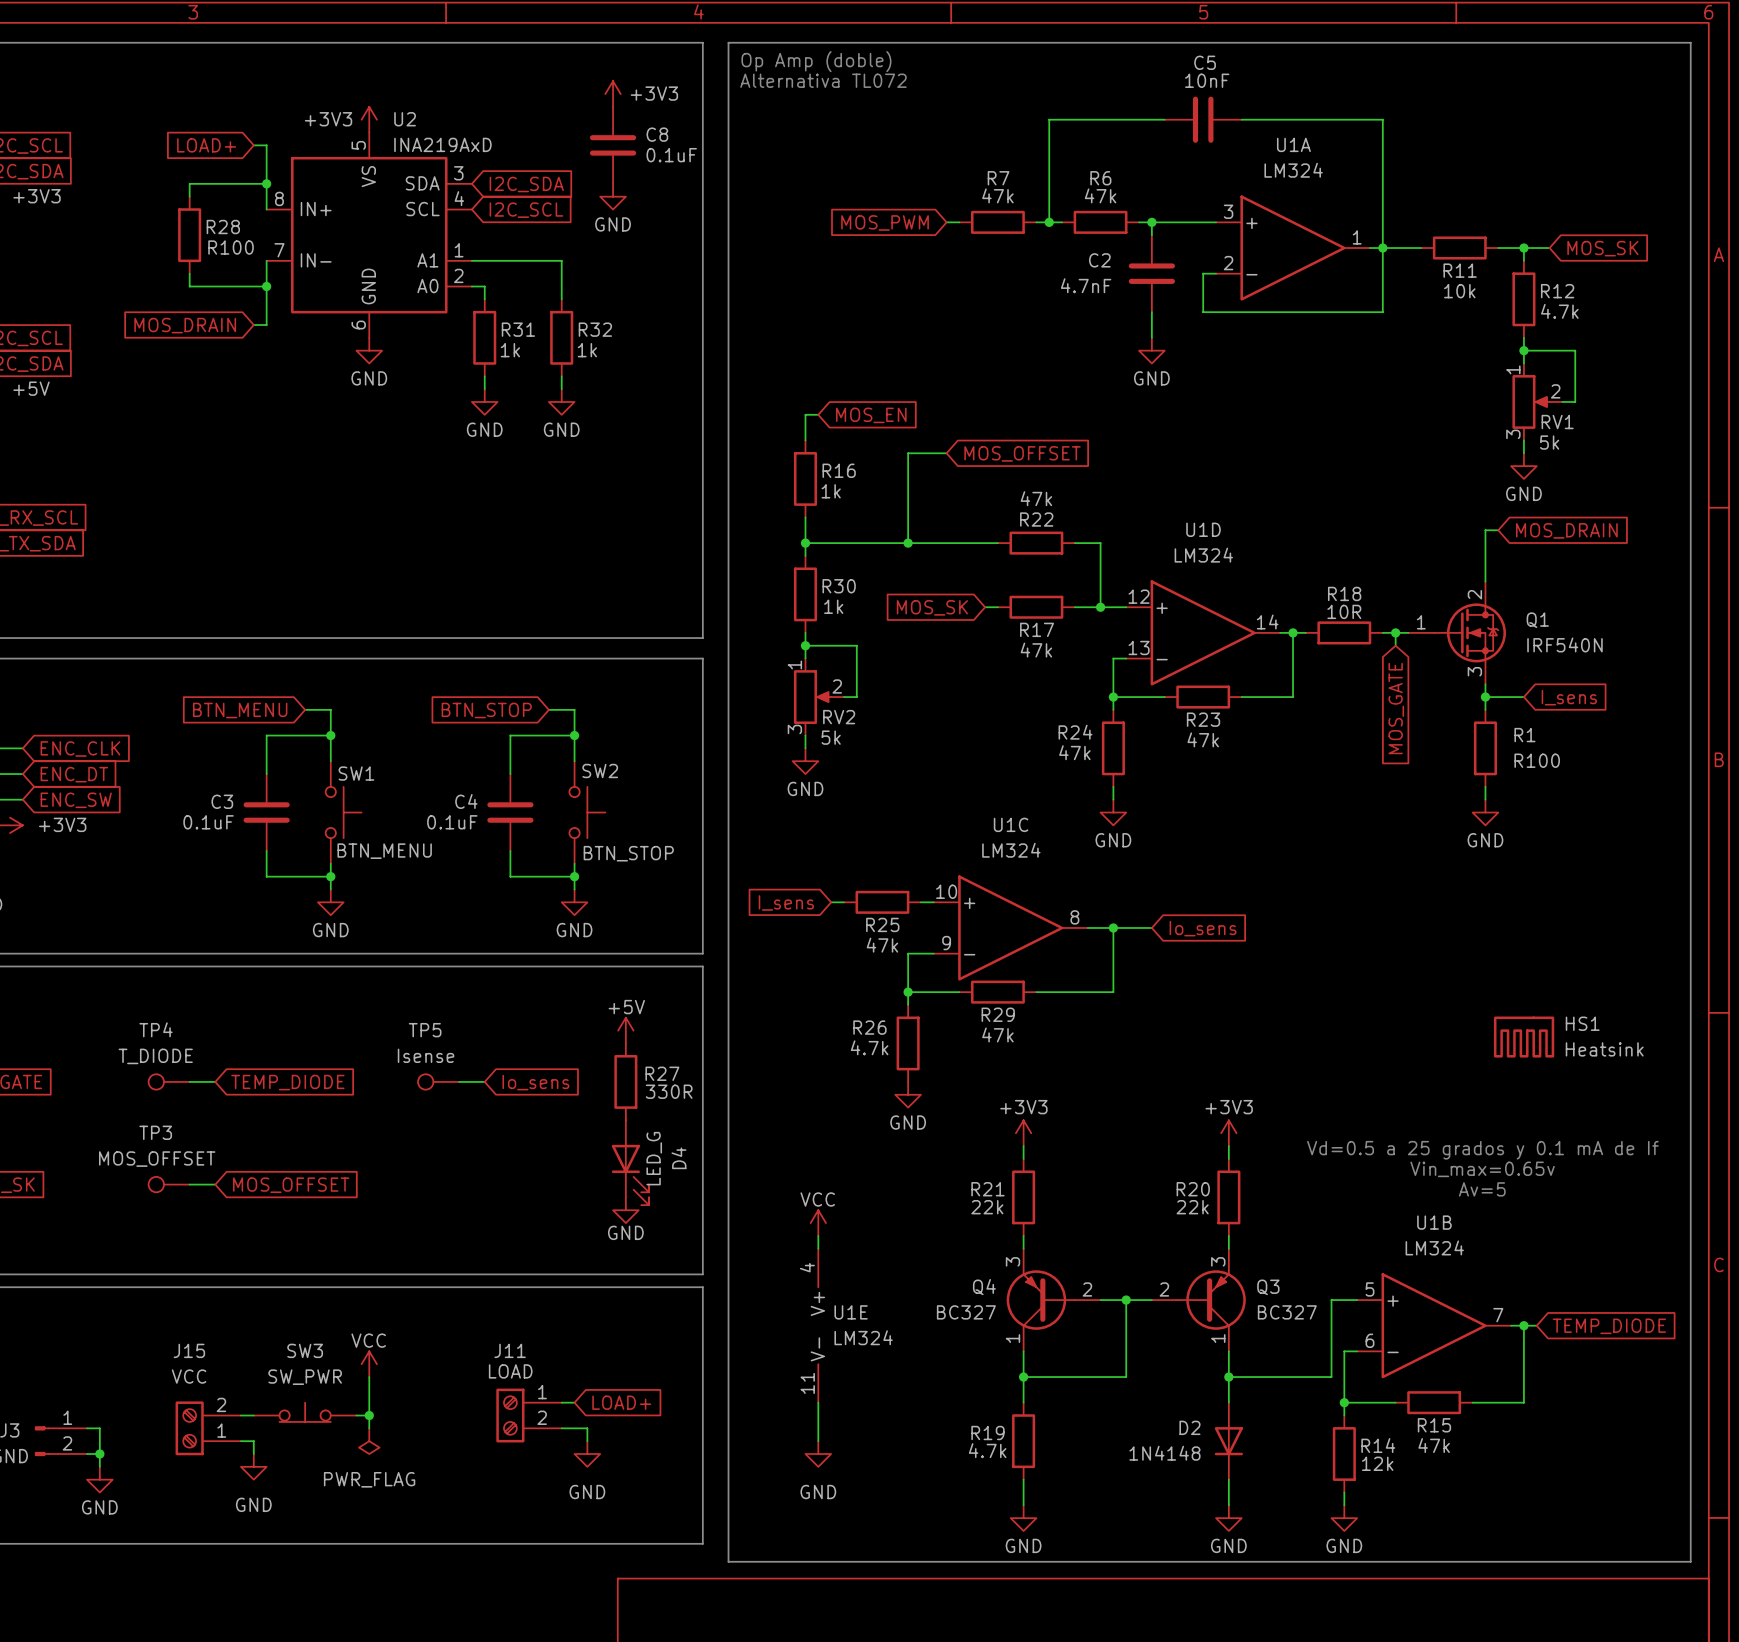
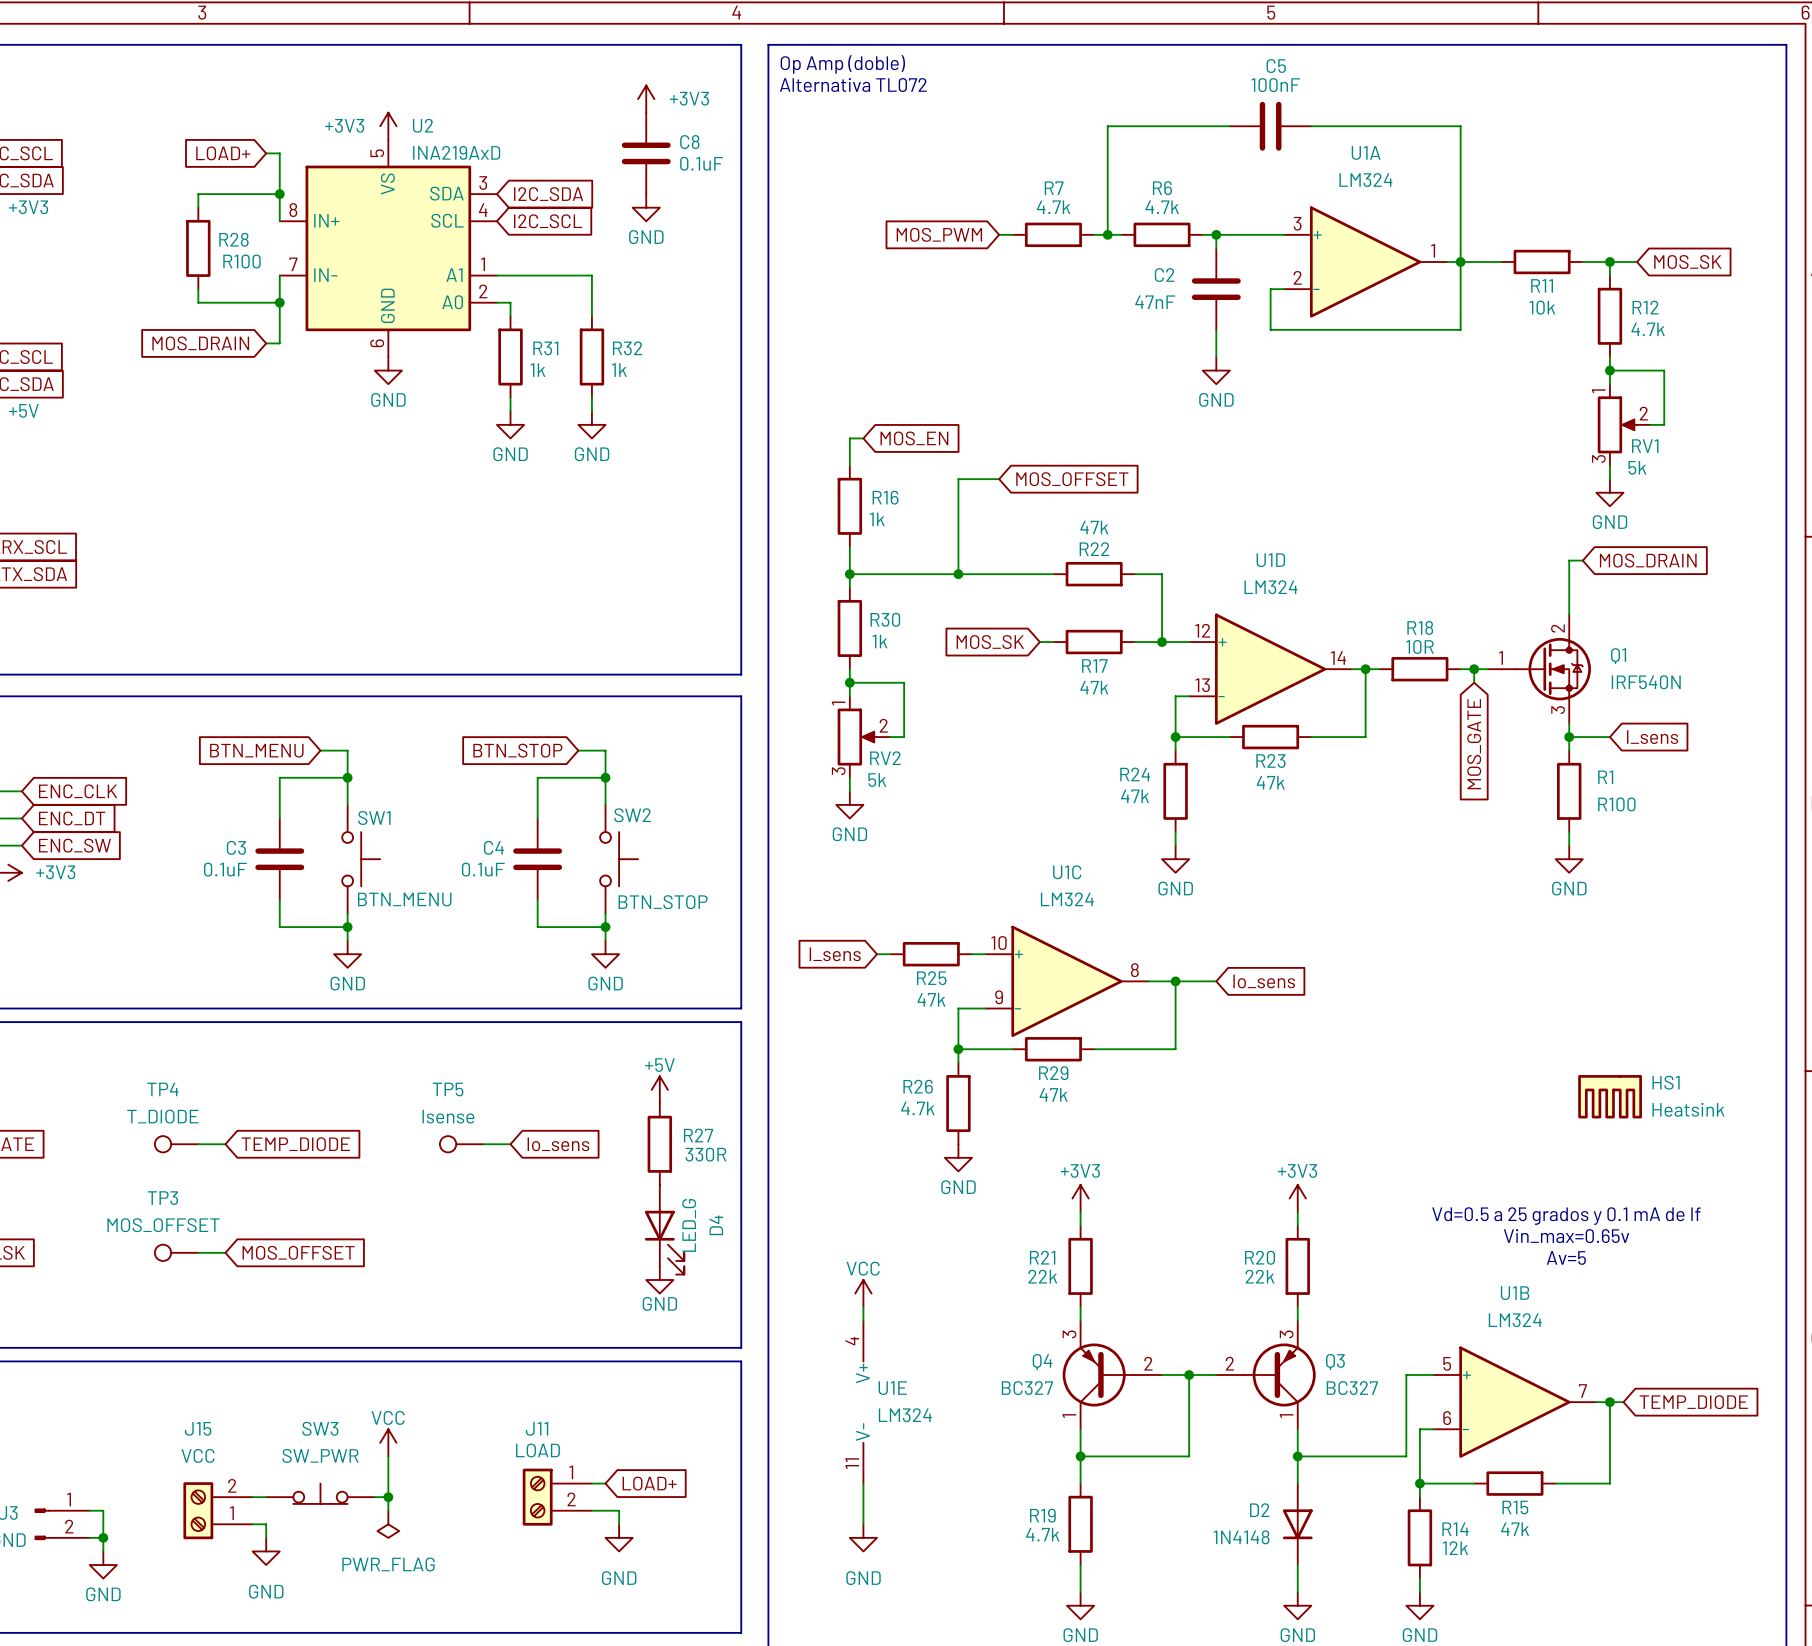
C5 value: 10nF (1207, 80) -> 100nF (1275, 85)
R7 value: 47k (997, 195) -> 4.7k (1053, 207)
R6 value: 47k (1100, 195) -> 4.7k (1162, 207)
C2 value: 4.7nF (1086, 285) -> 47nF (1155, 302)

